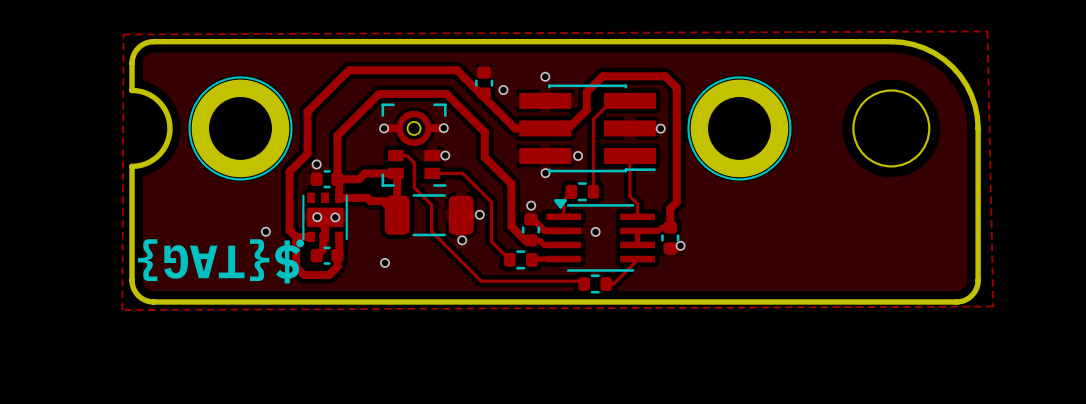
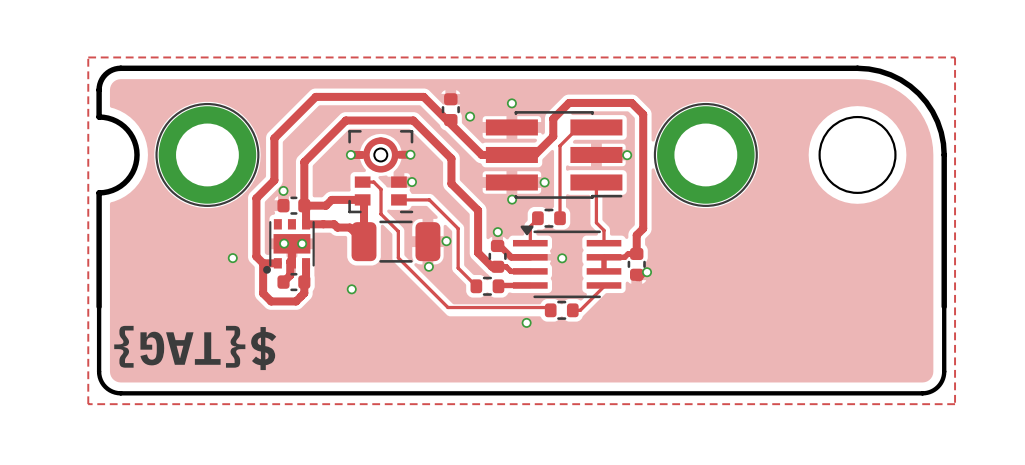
zone outline: (987, 31) (123, 34) (122, 310) (993, 306) (987, 31) -> (88, 57) (88, 404) (955, 404) (955, 57) (88, 57)
text position: ${TAG} (219, 261) -> ${TAG} (195, 347)
board edge: (132, 280) (133, 287) (138, 295) (146, 300) (153, 301) (956, 301) (963, 300) (971, 295) (976, 287) (978, 280) -> (99, 306) (99, 377) (107, 388) (120, 393) (924, 393) (936, 388) (943, 376) (944, 306)
via: none -> (526, 322)

